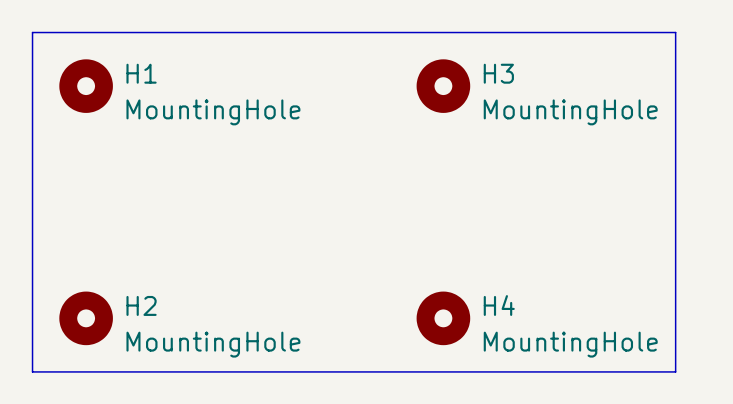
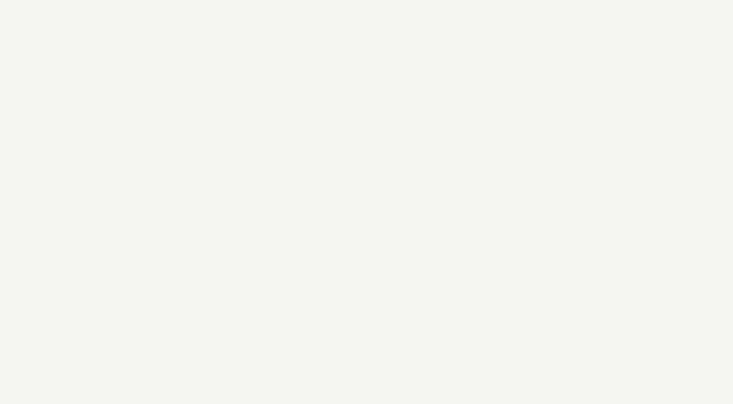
line: (32, 32) (32, 371) (675, 371) (675, 32) (32, 32) -> none
H1: MountingHole (86, 86) -> none
H3: MountingHole (443, 86) -> none
H2: MountingHole (86, 318) -> none
H4: MountingHole (443, 318) -> none

